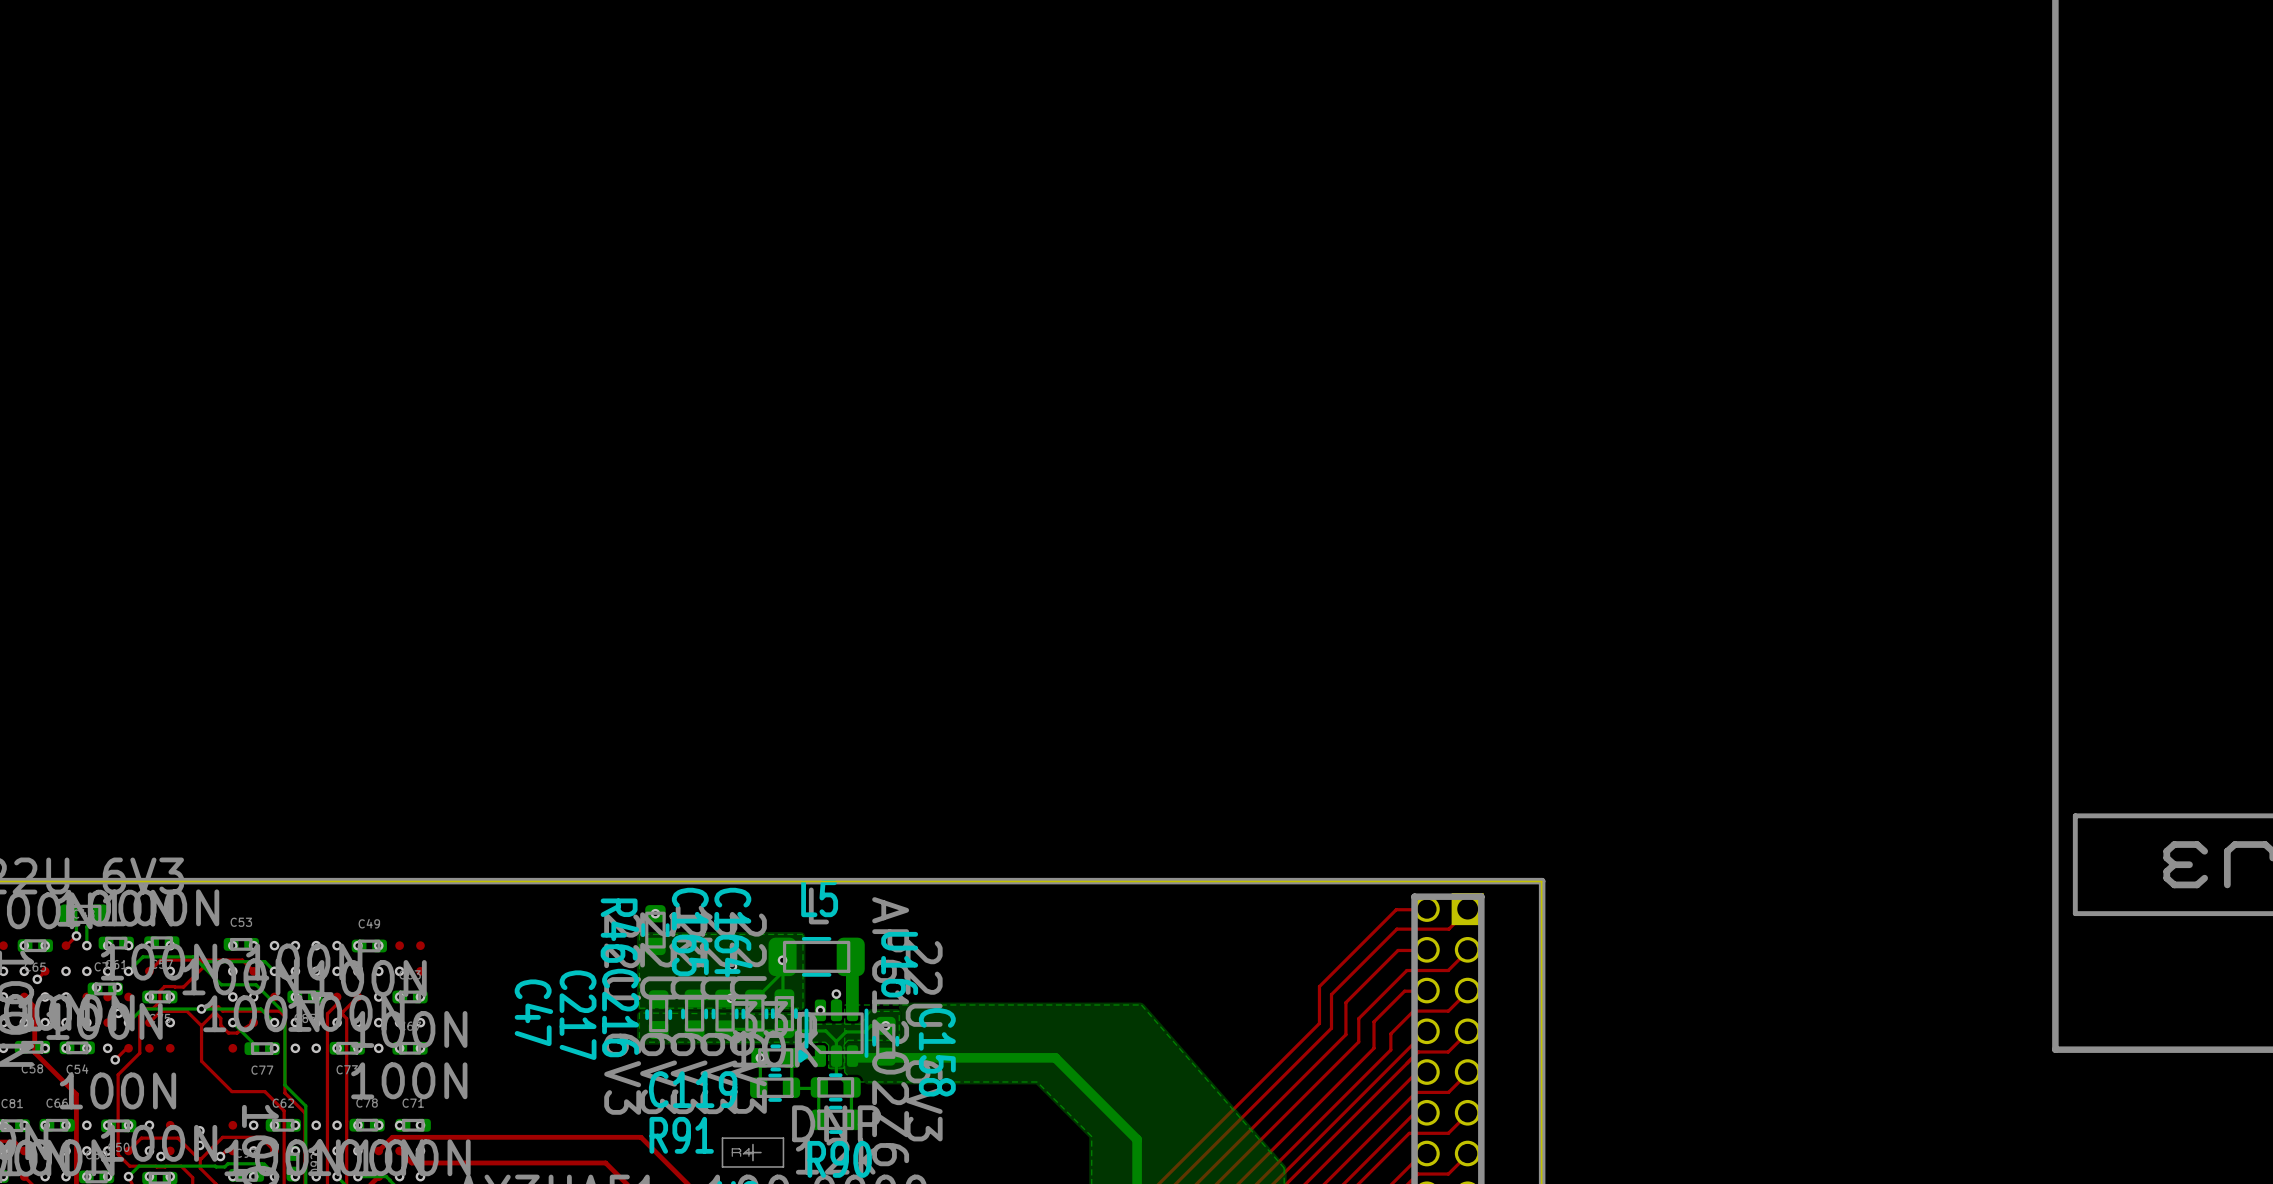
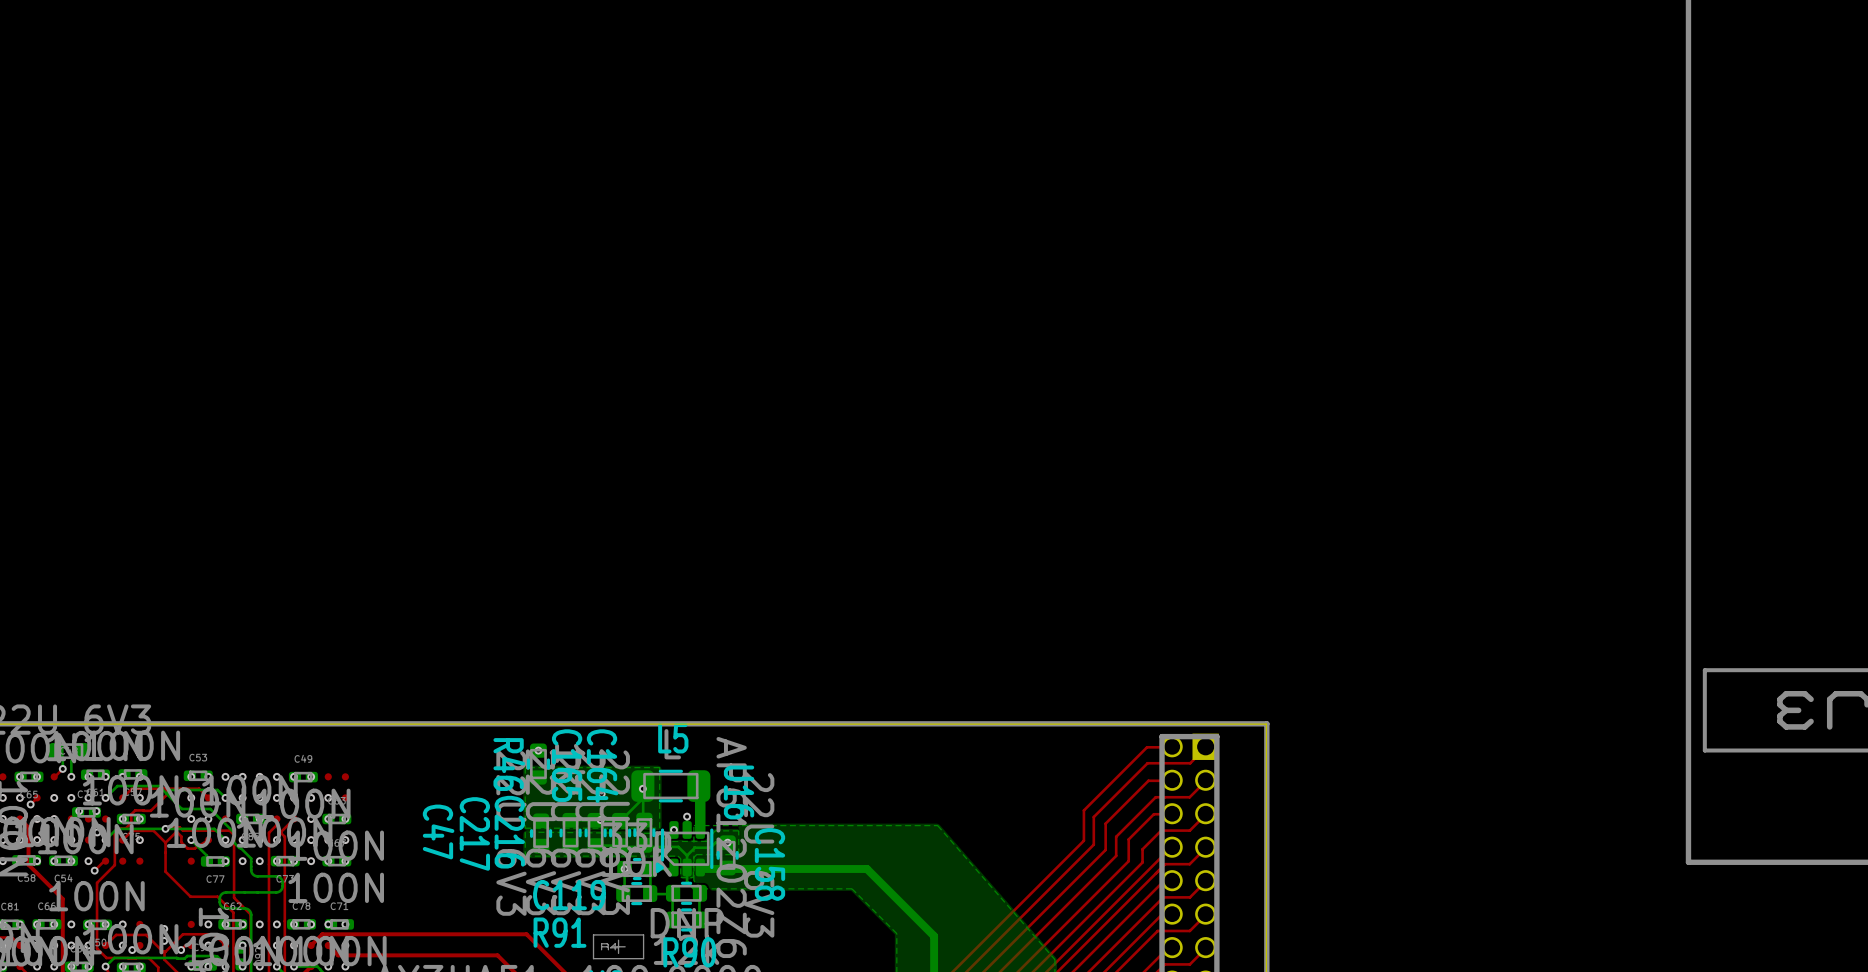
bottom track: (284, 1025) (284, 1085) (305, 1106) (305, 1113) -> (234, 842) (251, 858) (251, 870) (253, 875) (277, 876) (282, 881) (282, 888) (277, 892) (226, 892) (220, 895) (219, 902) (222, 907) (246, 908) (251, 914)

